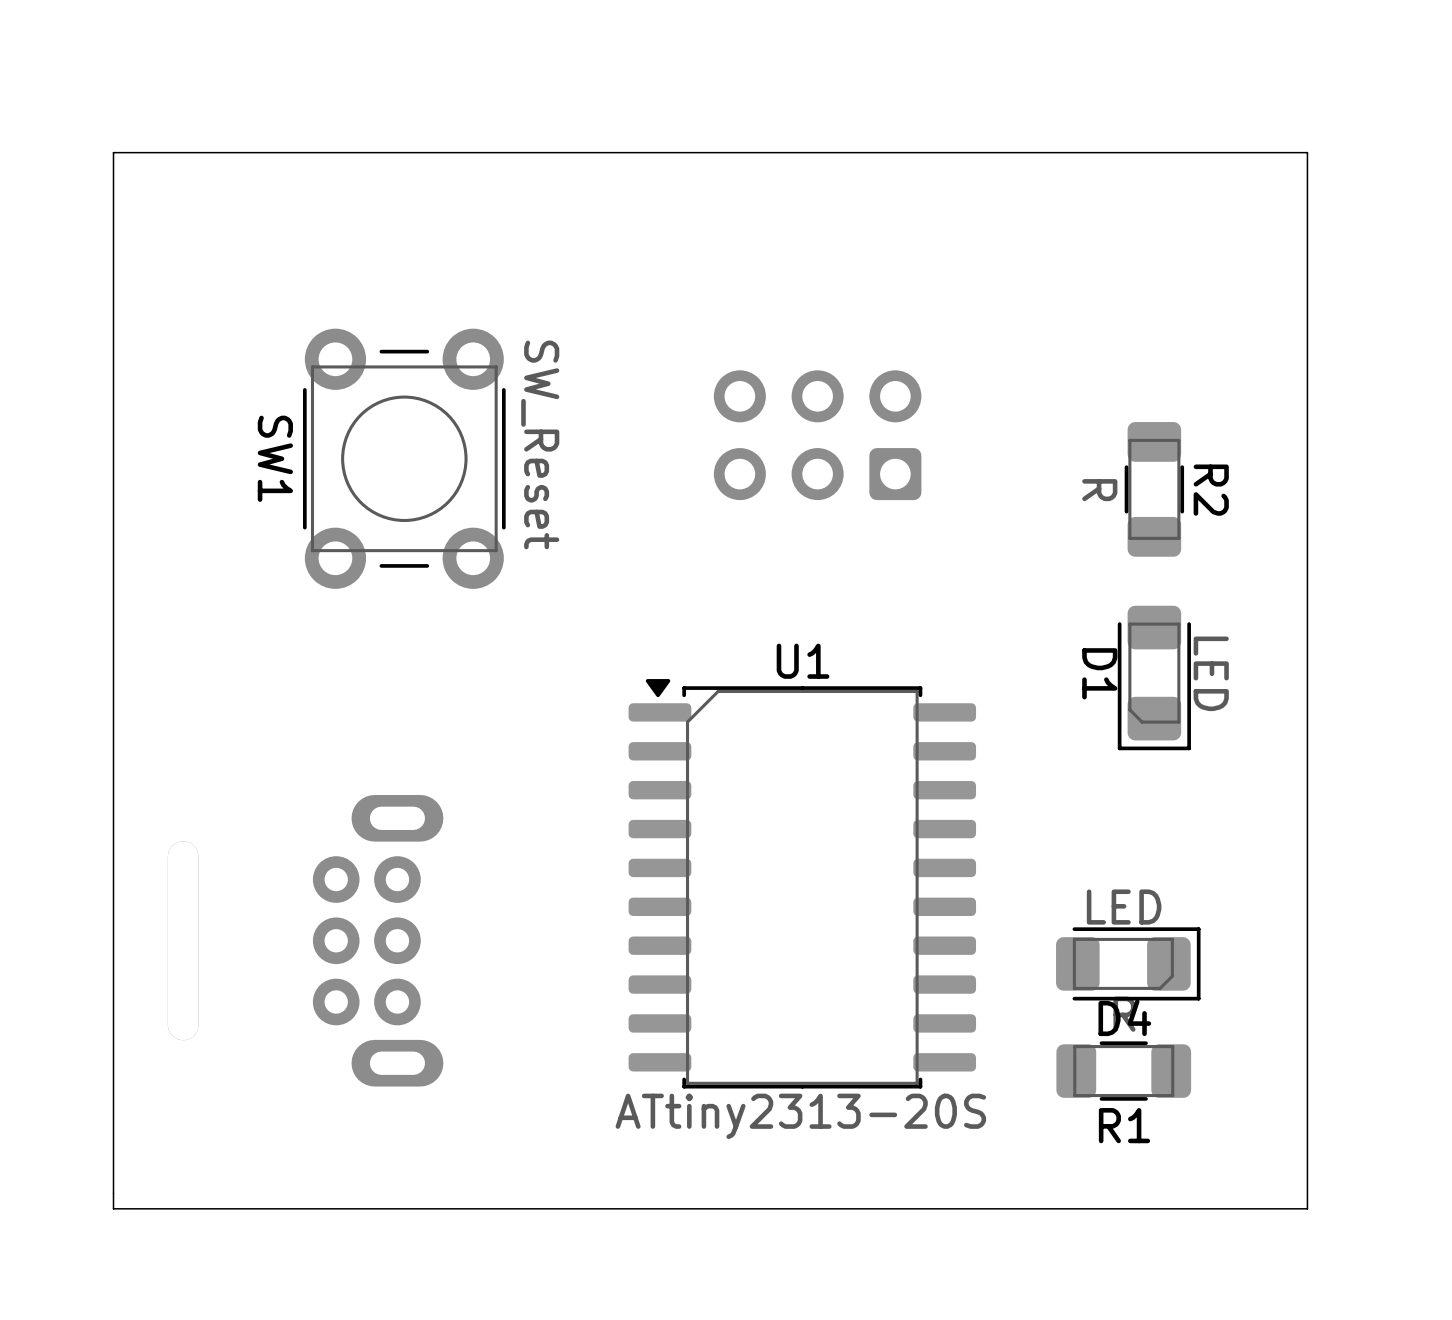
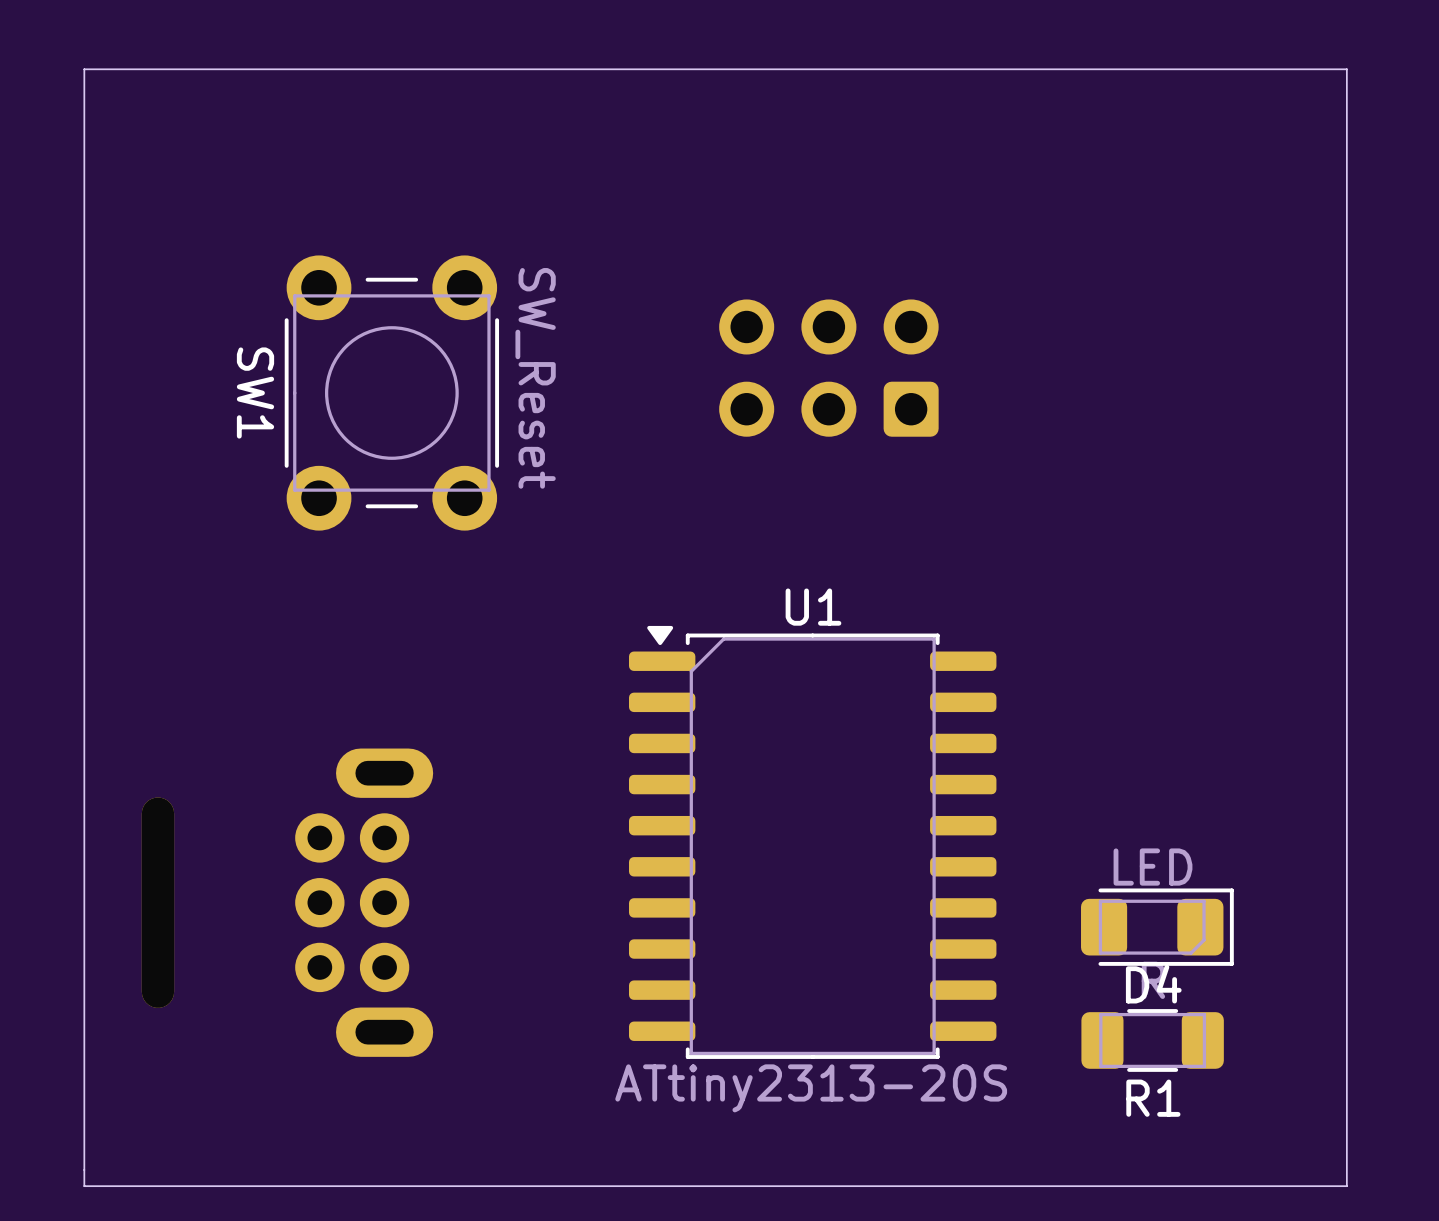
R2: R (1154, 489) -> none
D1: LED (1154, 677) -> none

